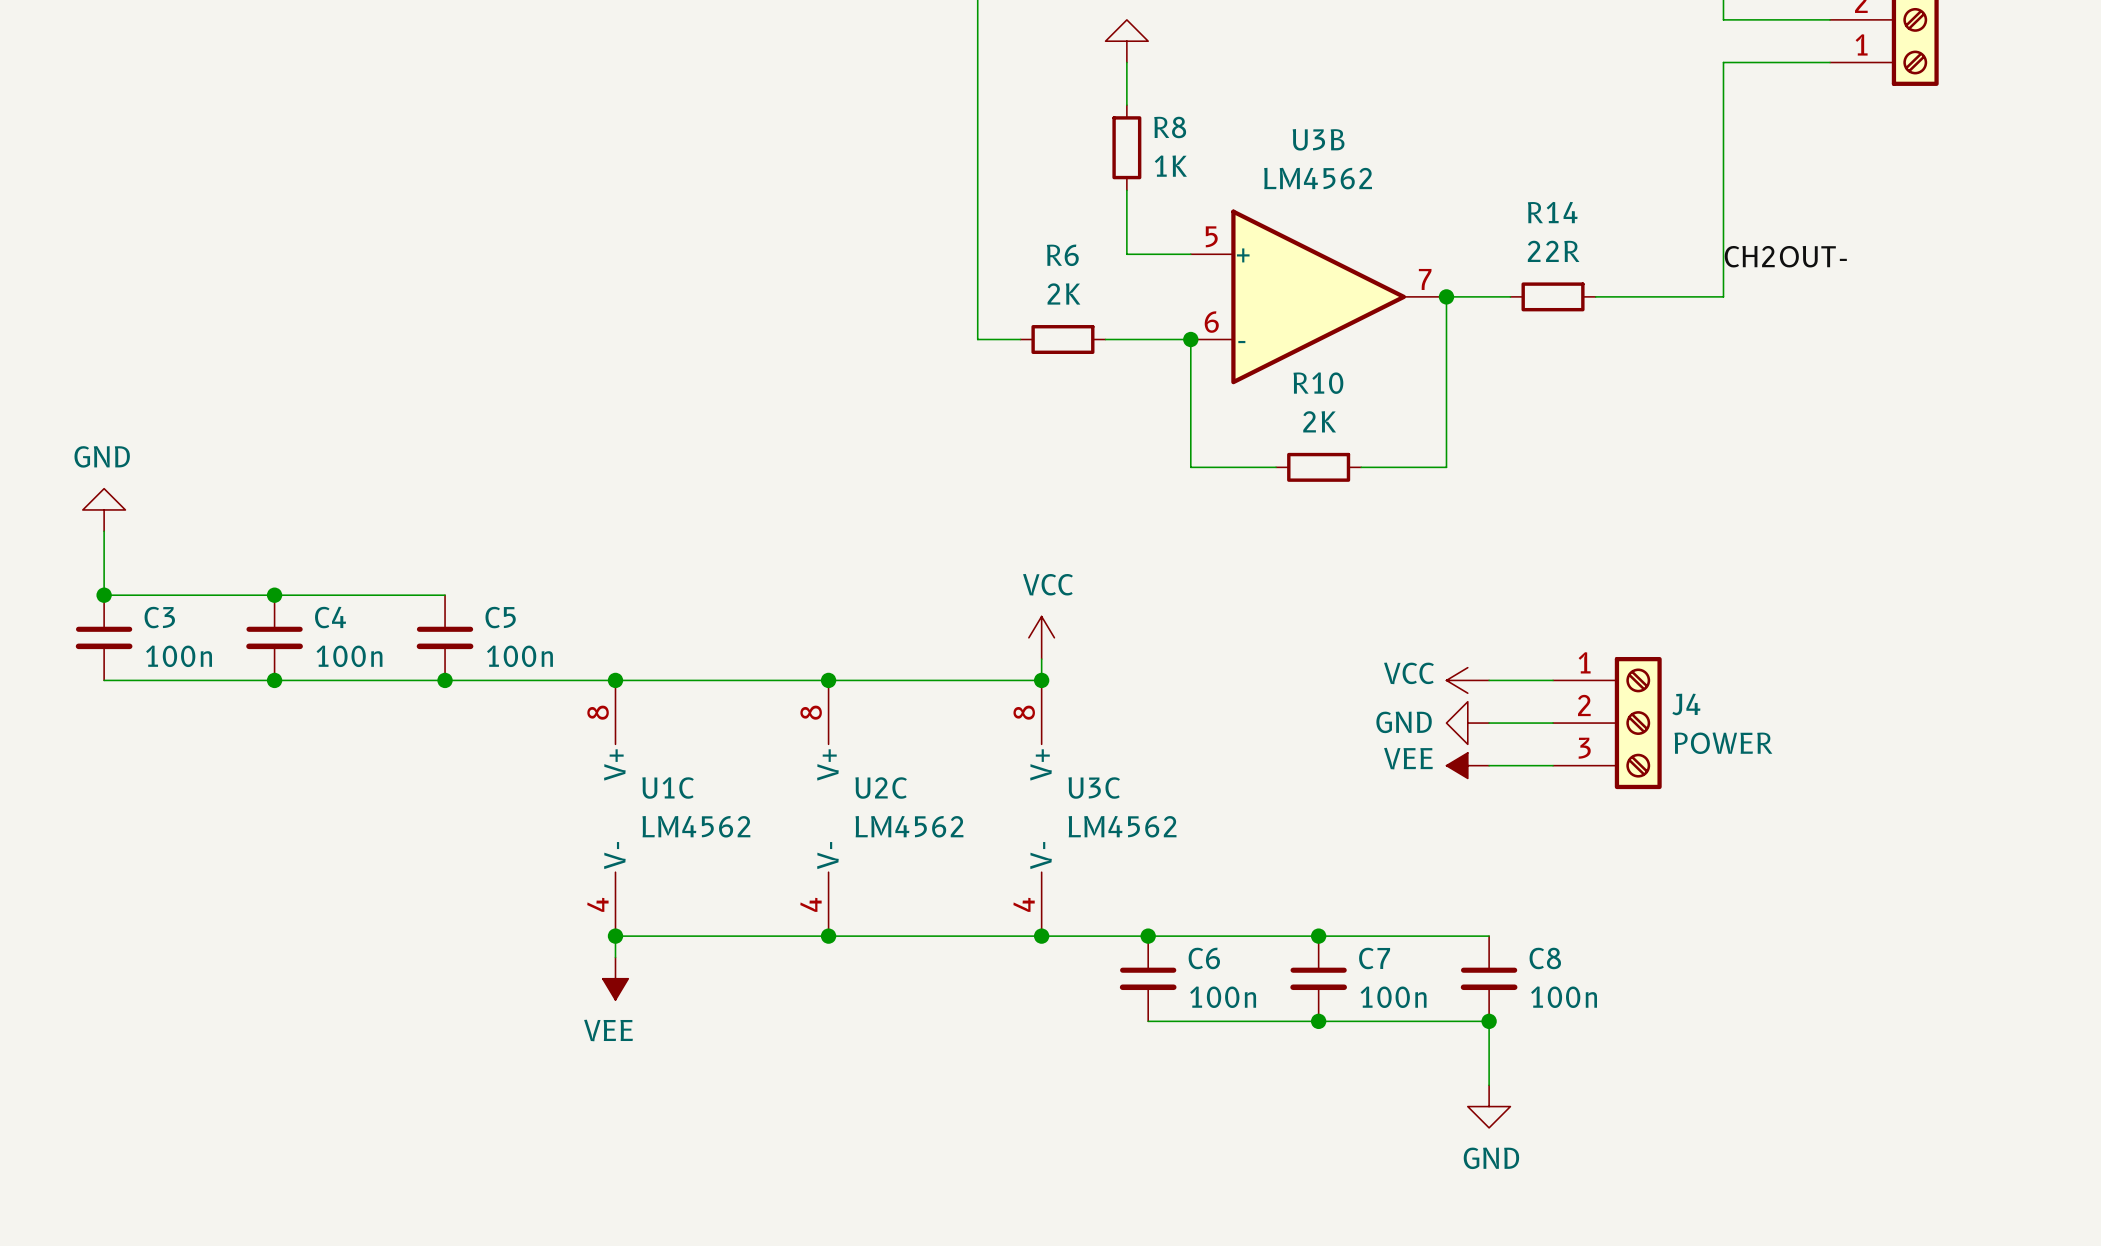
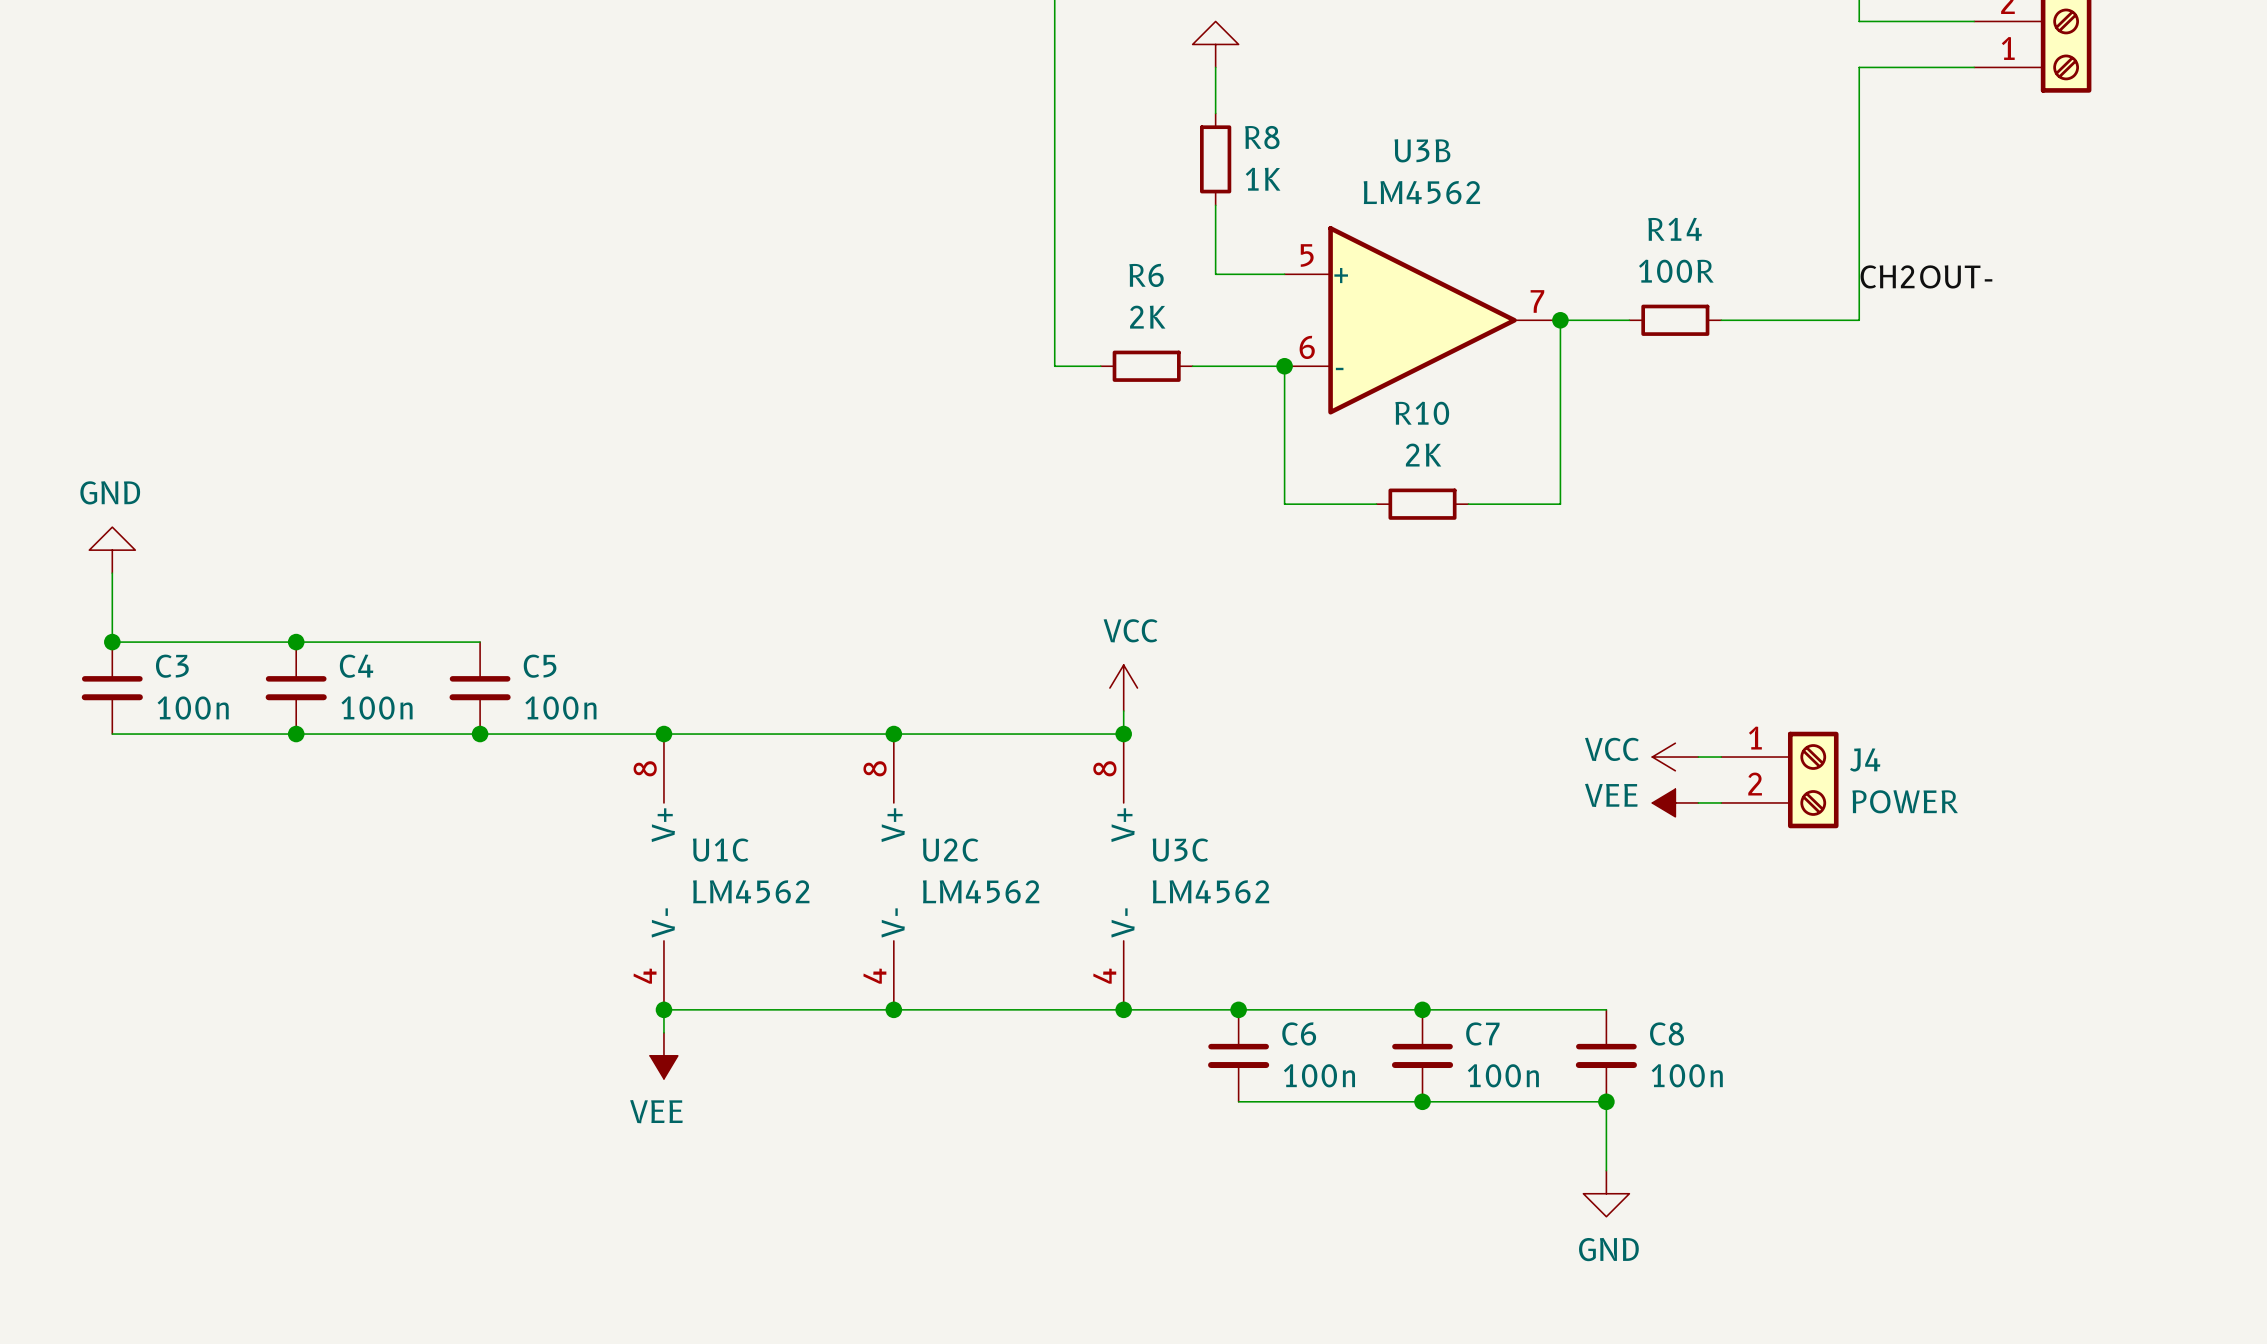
R14 value: 22R (1553, 251) -> 100R (1676, 271)
J4 symbol: [1553, 656, 1662, 790] -> [1721, 731, 1839, 829]
power symbol position: VCC (1467, 680) -> VCC (1675, 757)
wire: (1489, 680) (1553, 680) -> none
wire: none -> (1698, 757) (1721, 757)
power symbol: GND (1467, 723) -> none
wire: (1489, 723) (1553, 723) -> none
wire: none -> (1698, 802) (1721, 802)
power symbol position: VEE (1467, 765) -> VEE (1675, 802)
wire: (1489, 765) (1553, 765) -> none

